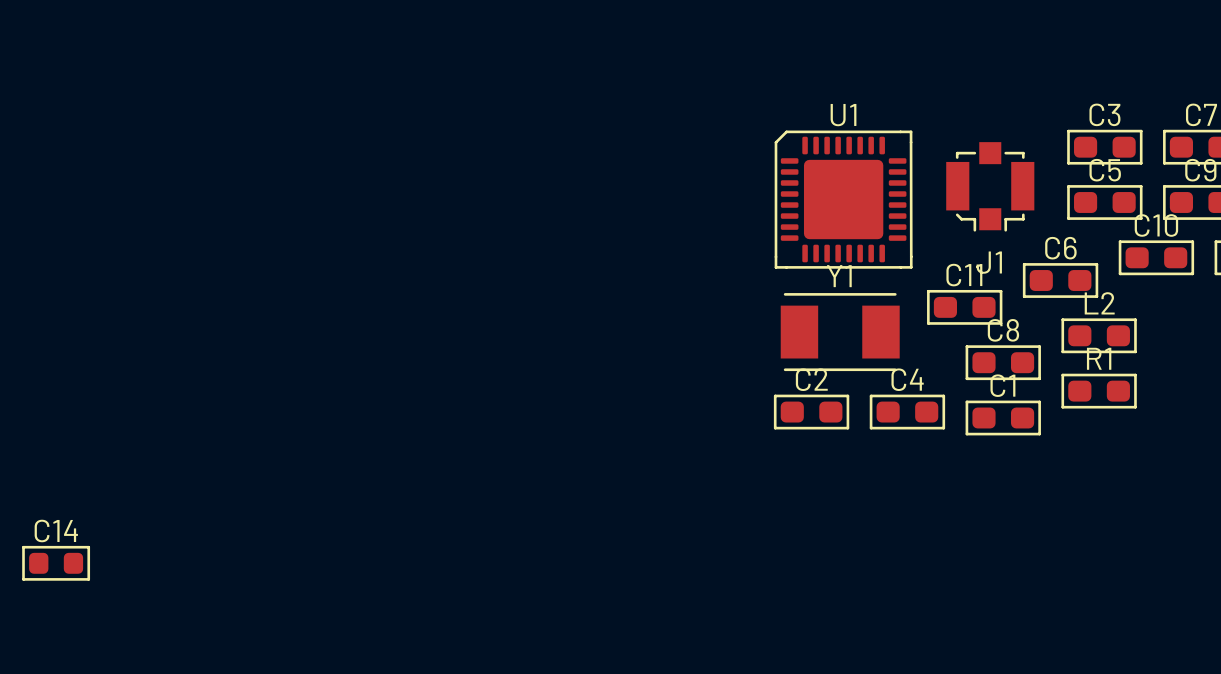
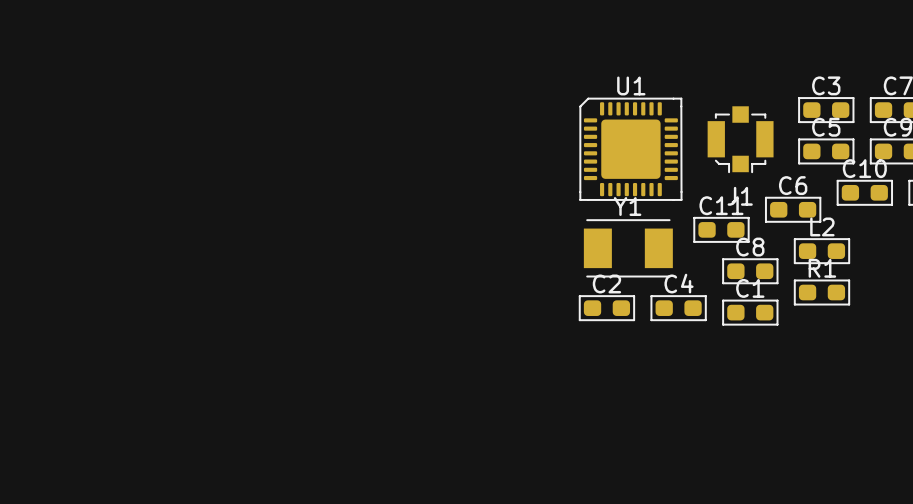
C14: (56, 563) -> none

